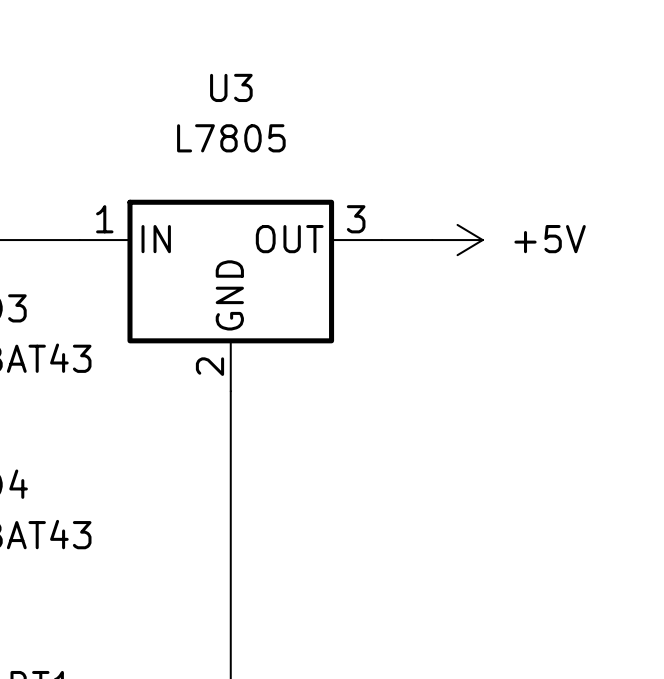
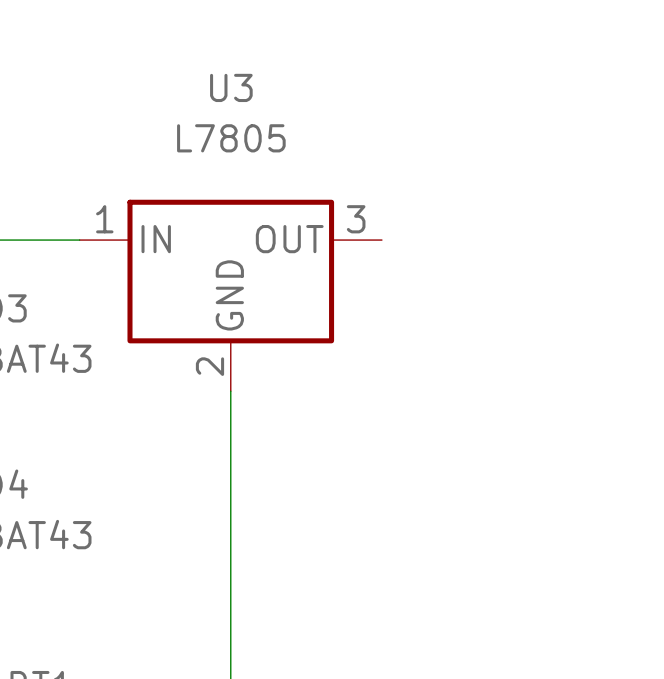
wire: (381, 240) (432, 240) -> none
power symbol: +5V (457, 240) -> none

